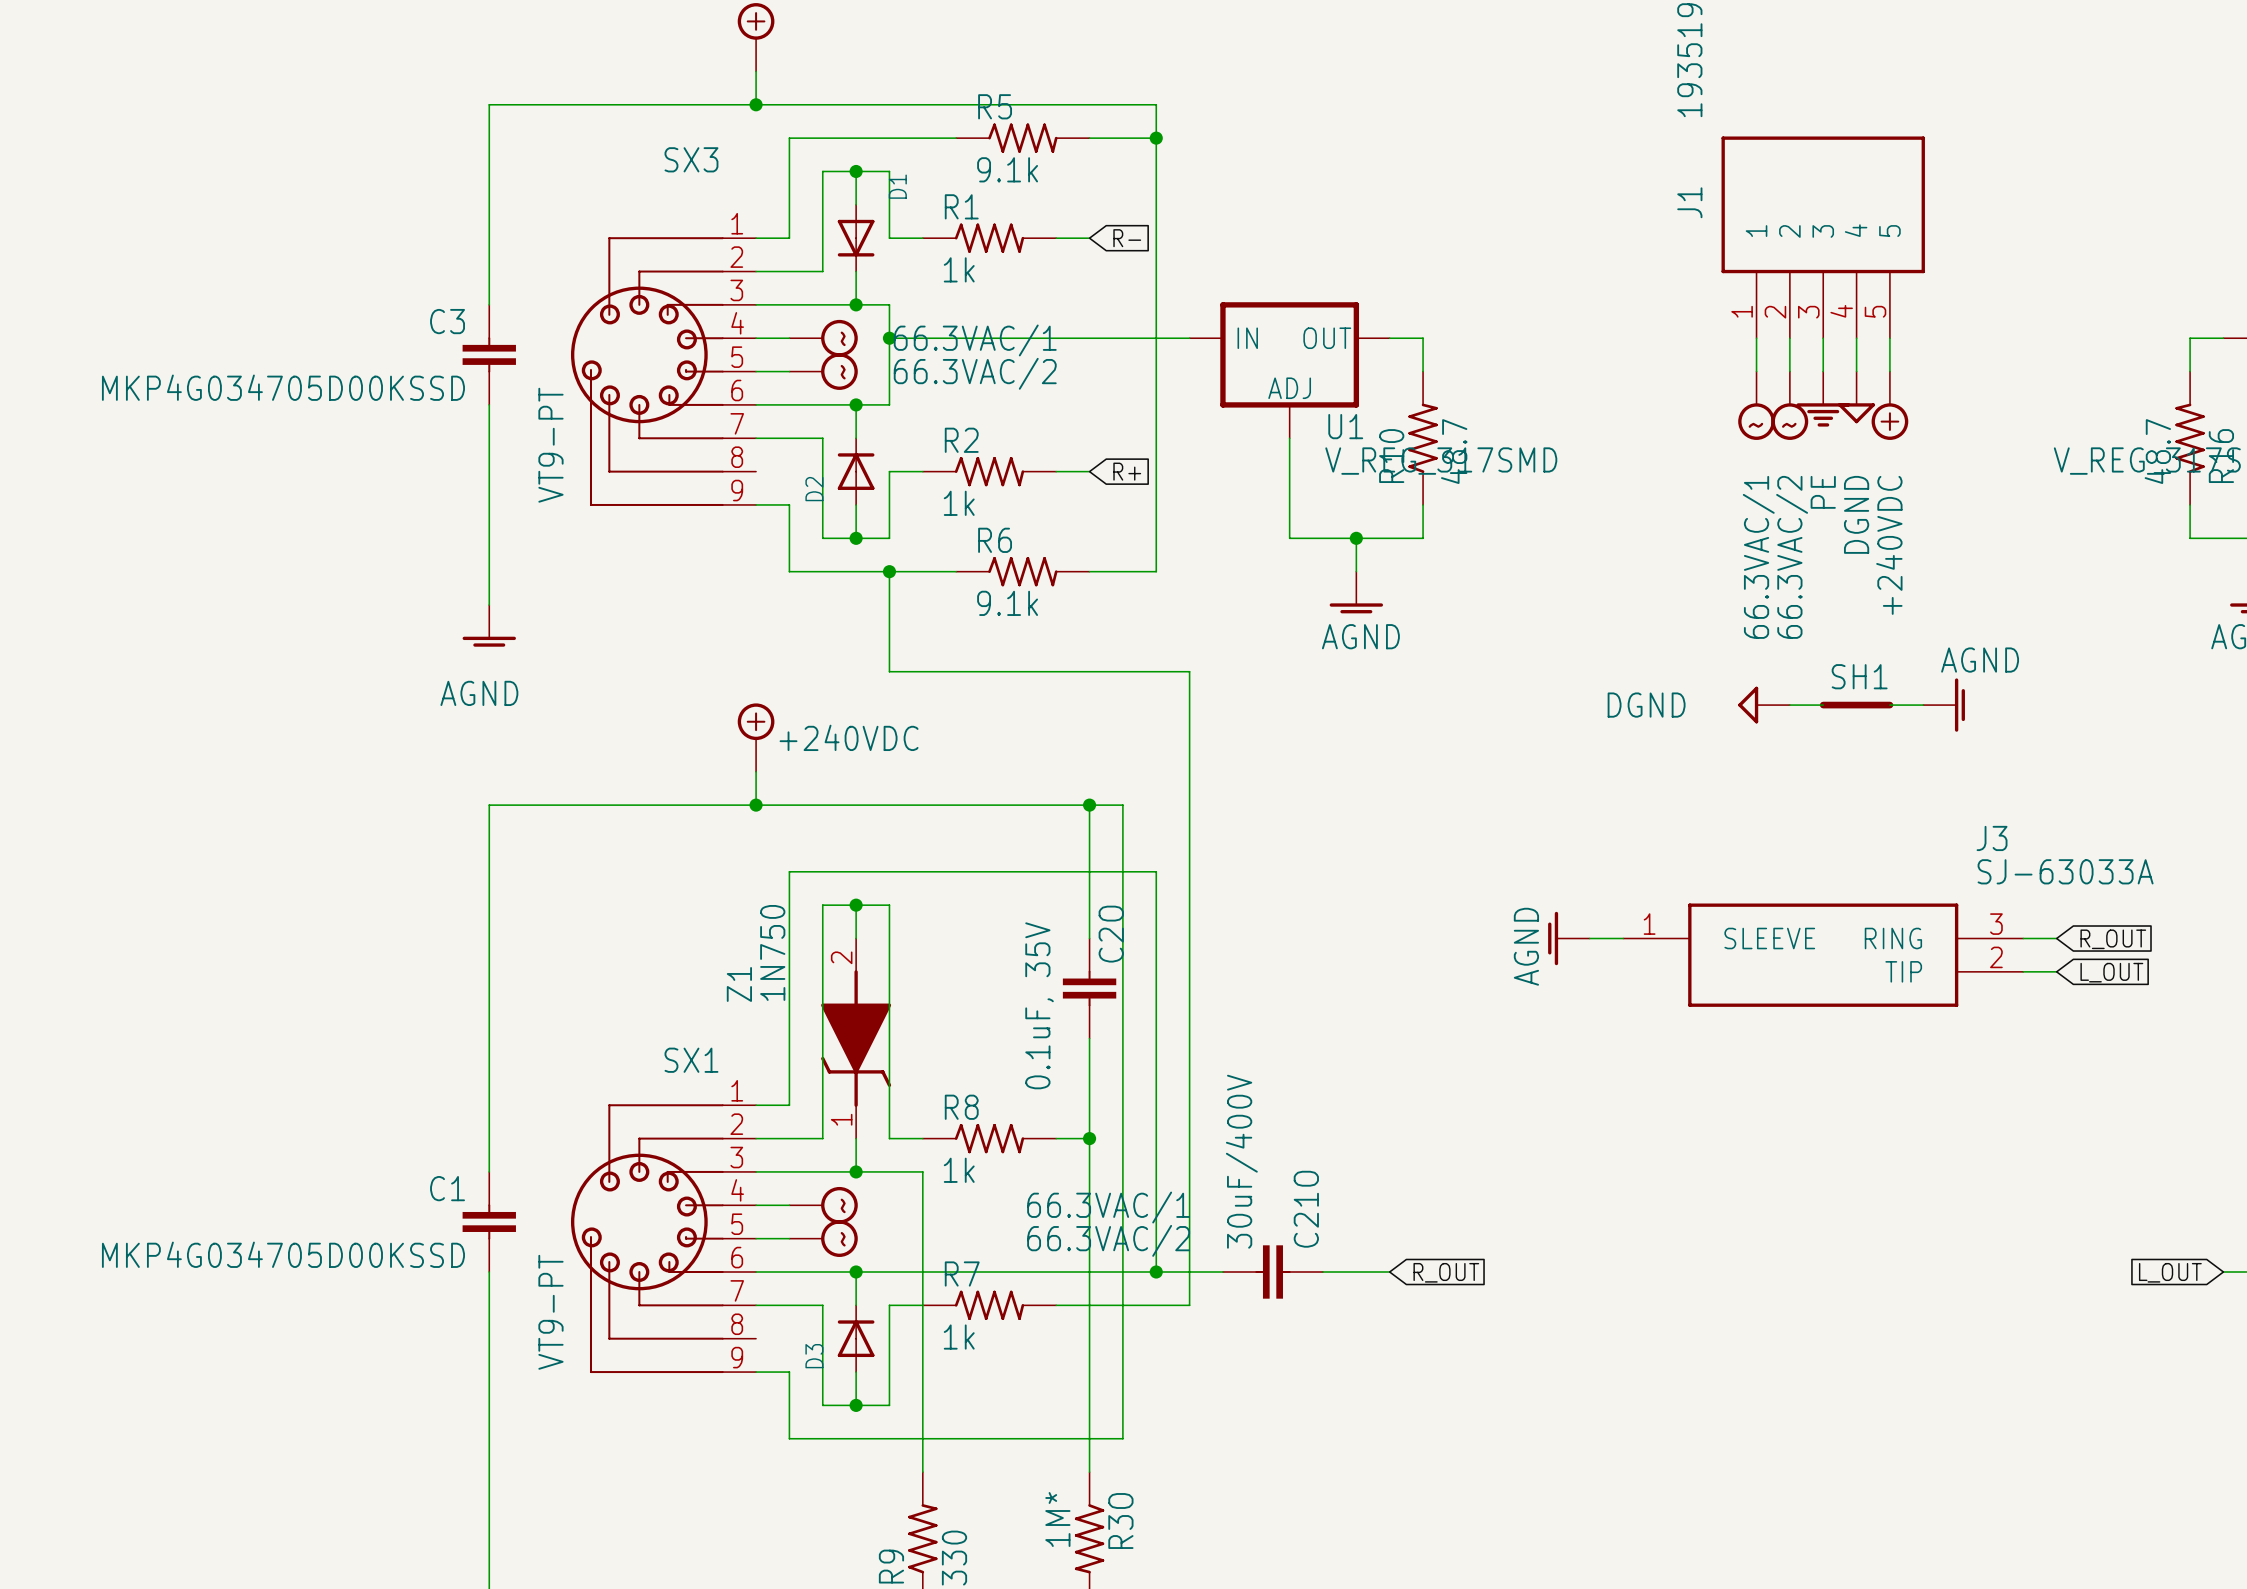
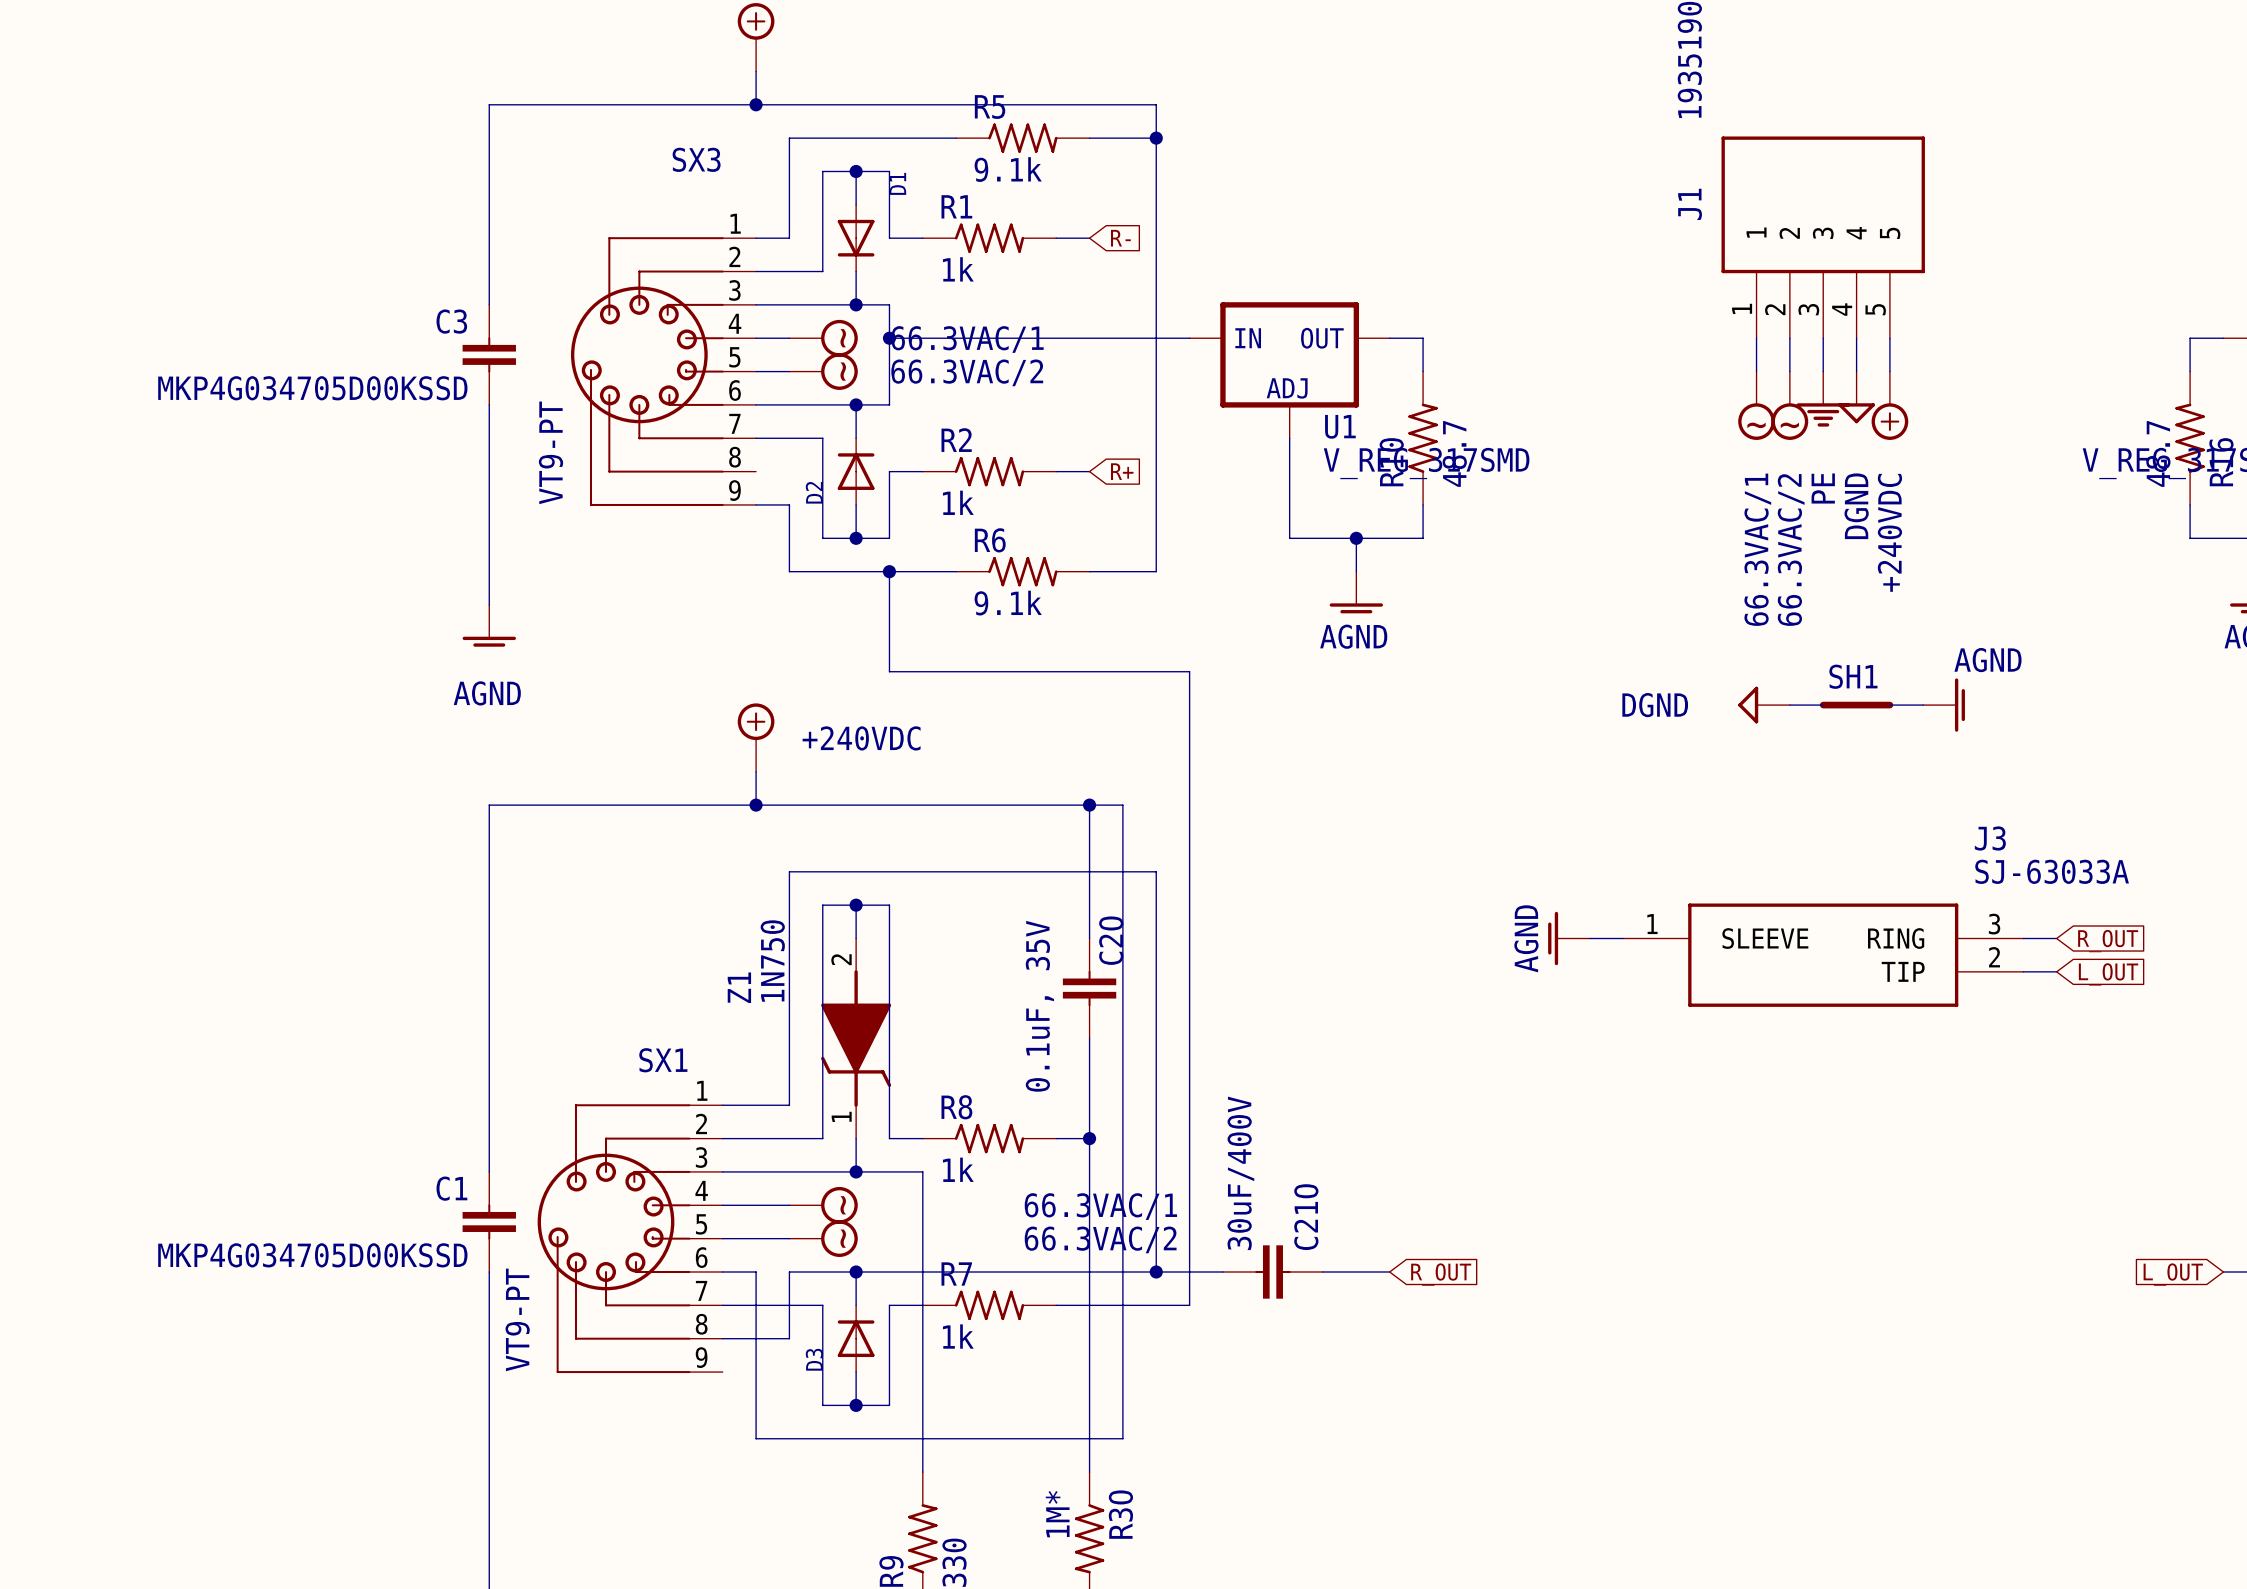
SX1 position: (663, 1238) -> (630, 1238)
wire: (756, 1271) (789, 1271) -> (722, 1338) (789, 1338) (789, 1271)
wire: (756, 1372) (789, 1372) (789, 1438) -> (722, 1271) (756, 1271) (756, 1438) (789, 1438)

